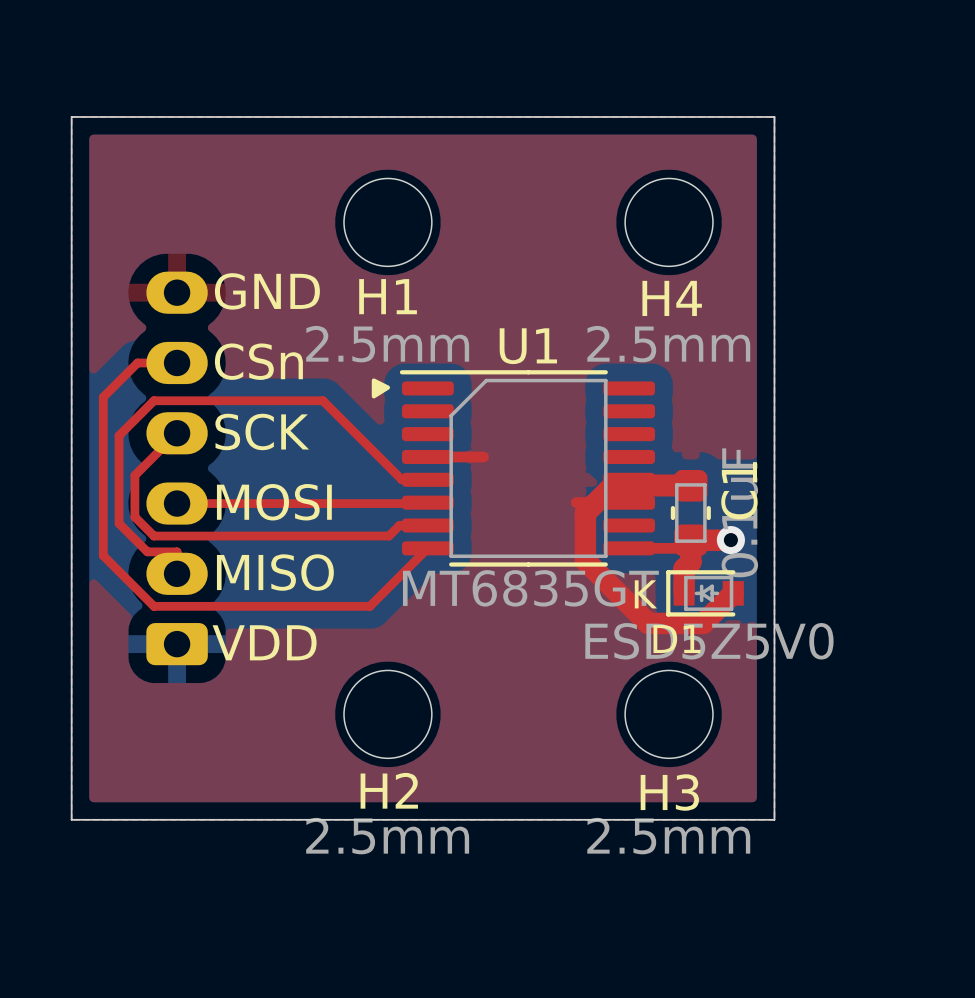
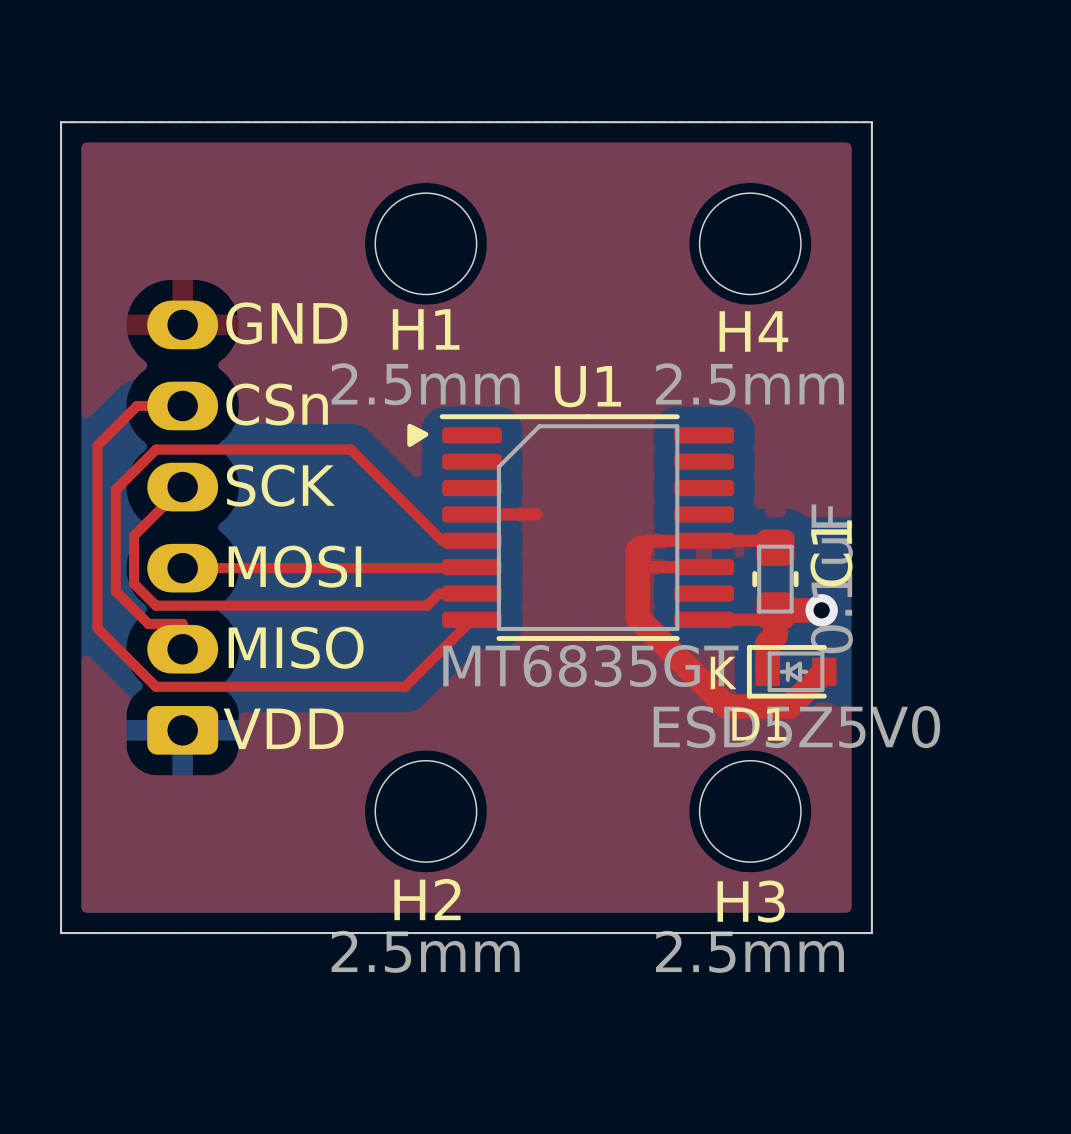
top track: (690, 485) (612, 485) (585, 513) (585, 560) -> (704, 540) (647, 540) (637, 550) (637, 618) (653, 634)

